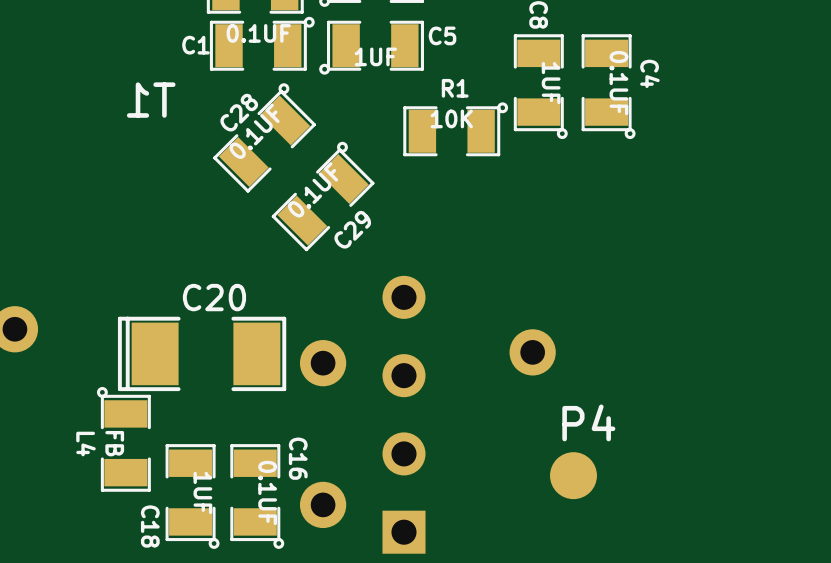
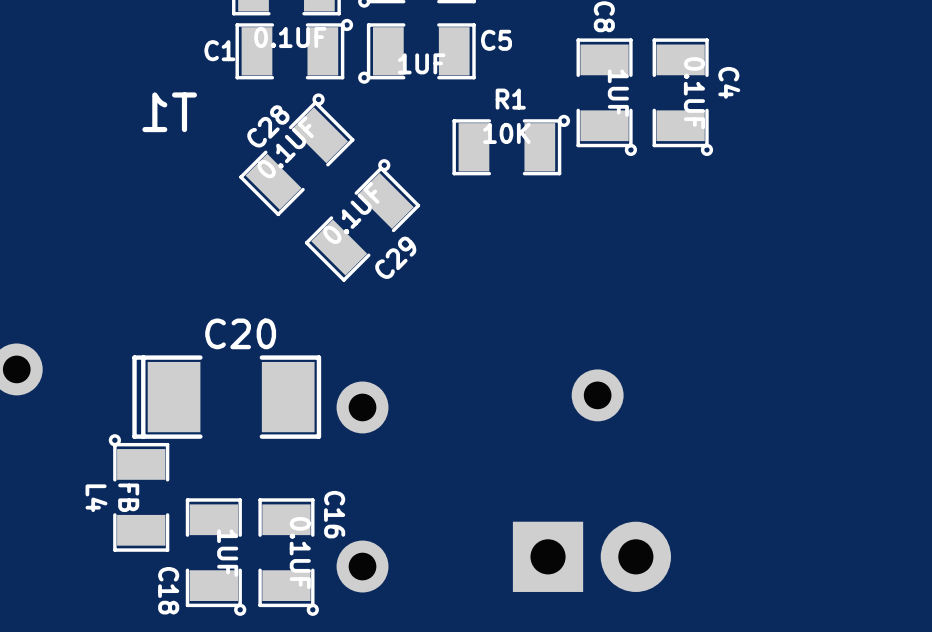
part: (403, 414) -> none
P4: (573, 475) -> none
part: none -> (591, 556)

